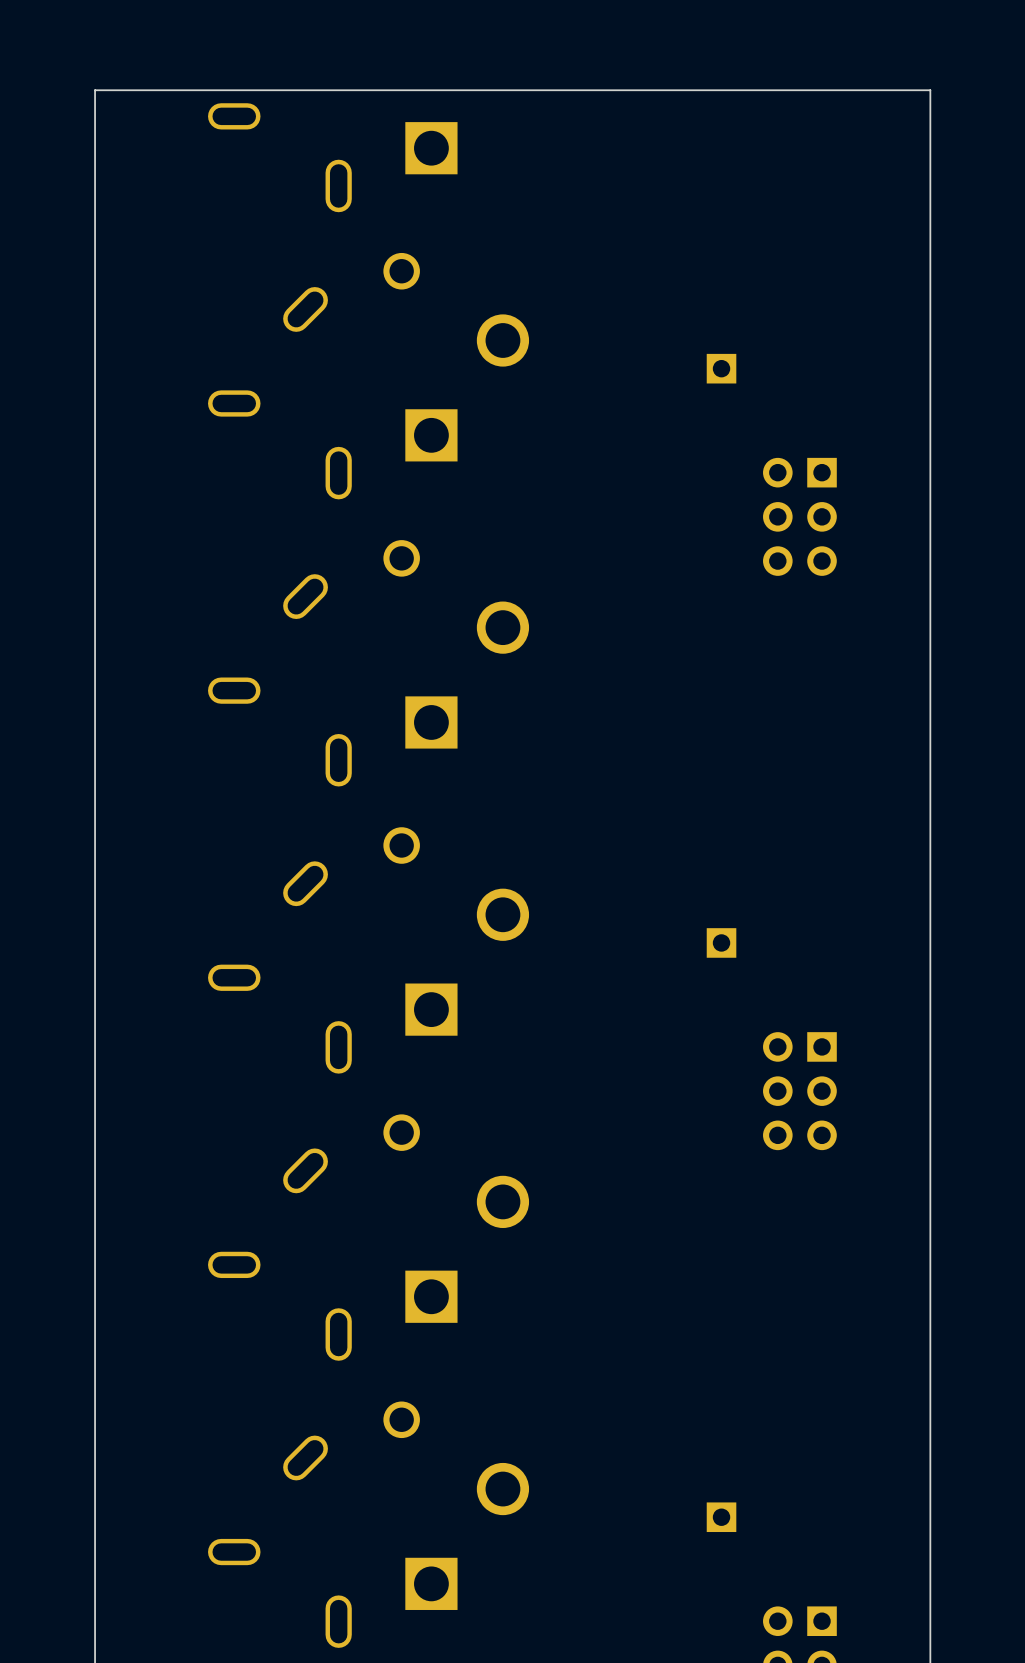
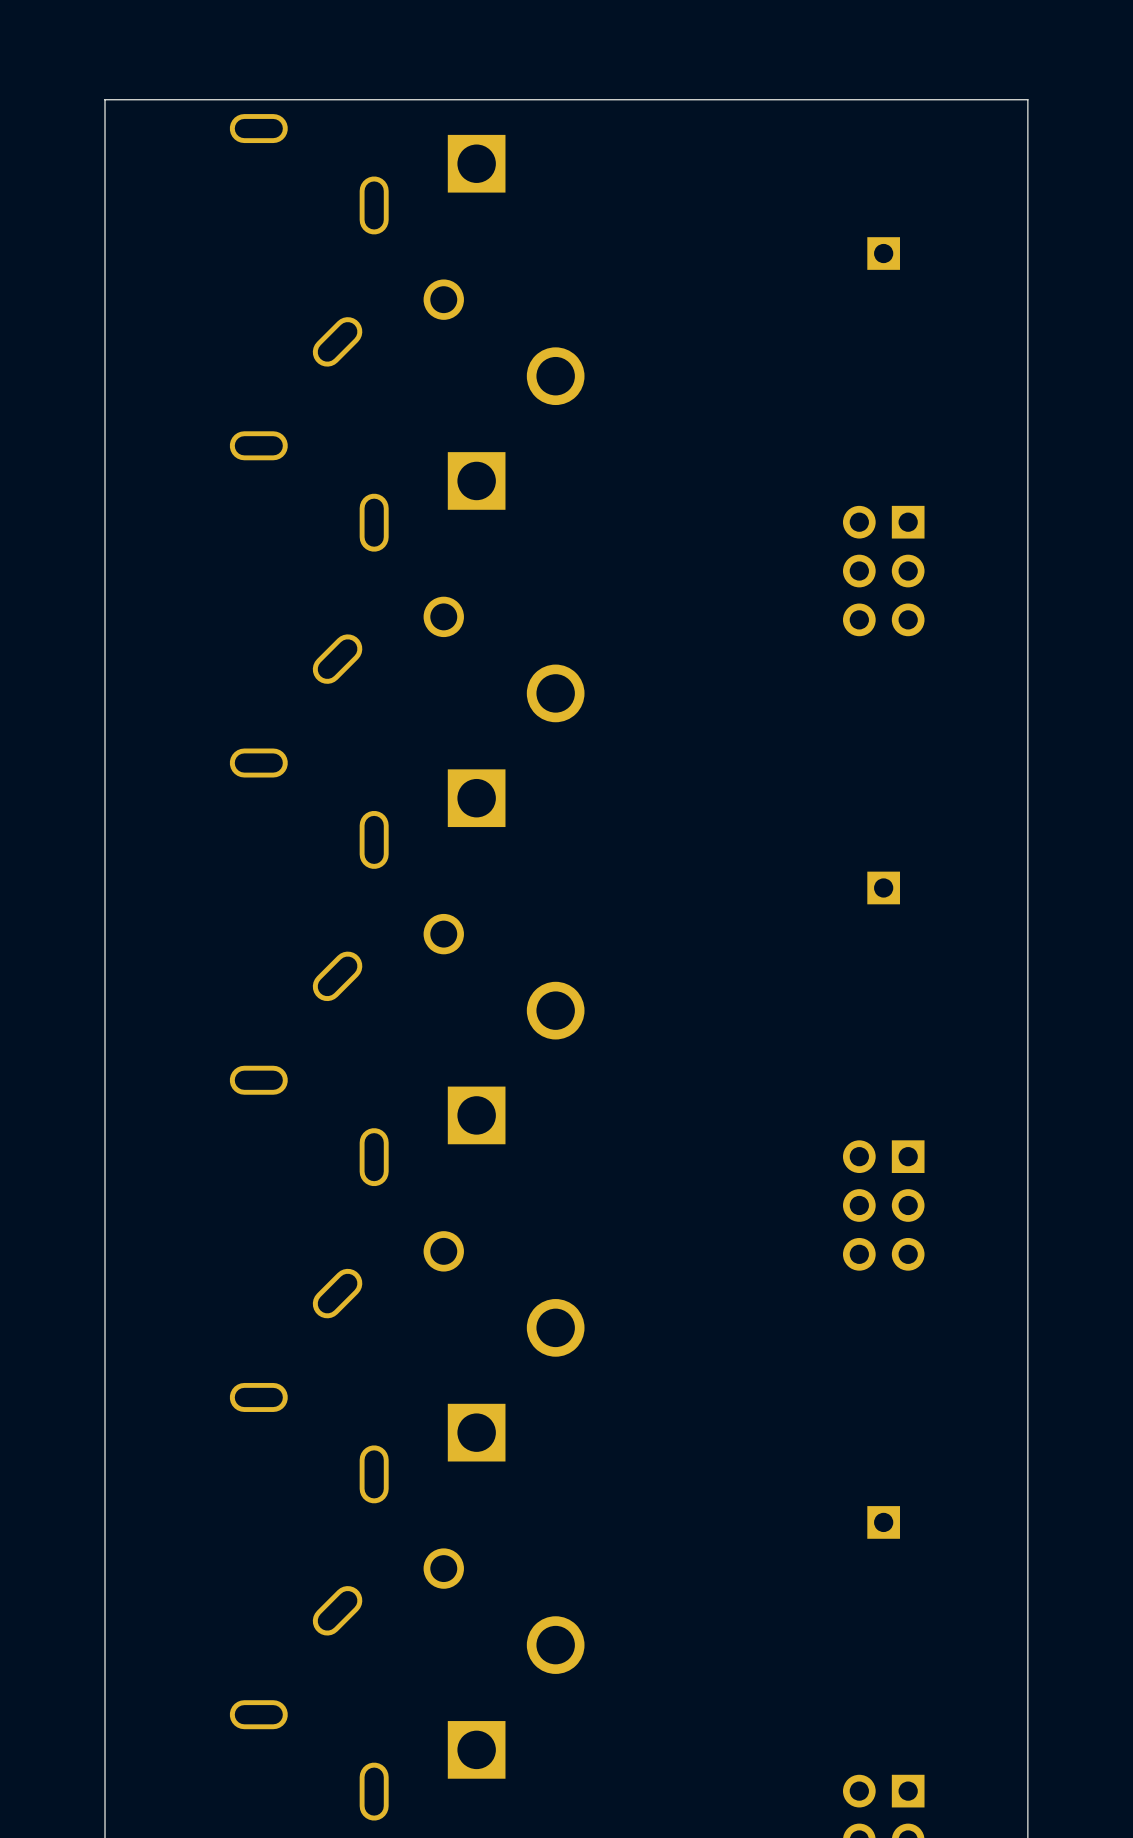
part position: (721, 368) -> (883, 253)
part position: (721, 942) -> (883, 887)
part position: (721, 1517) -> (883, 1522)

